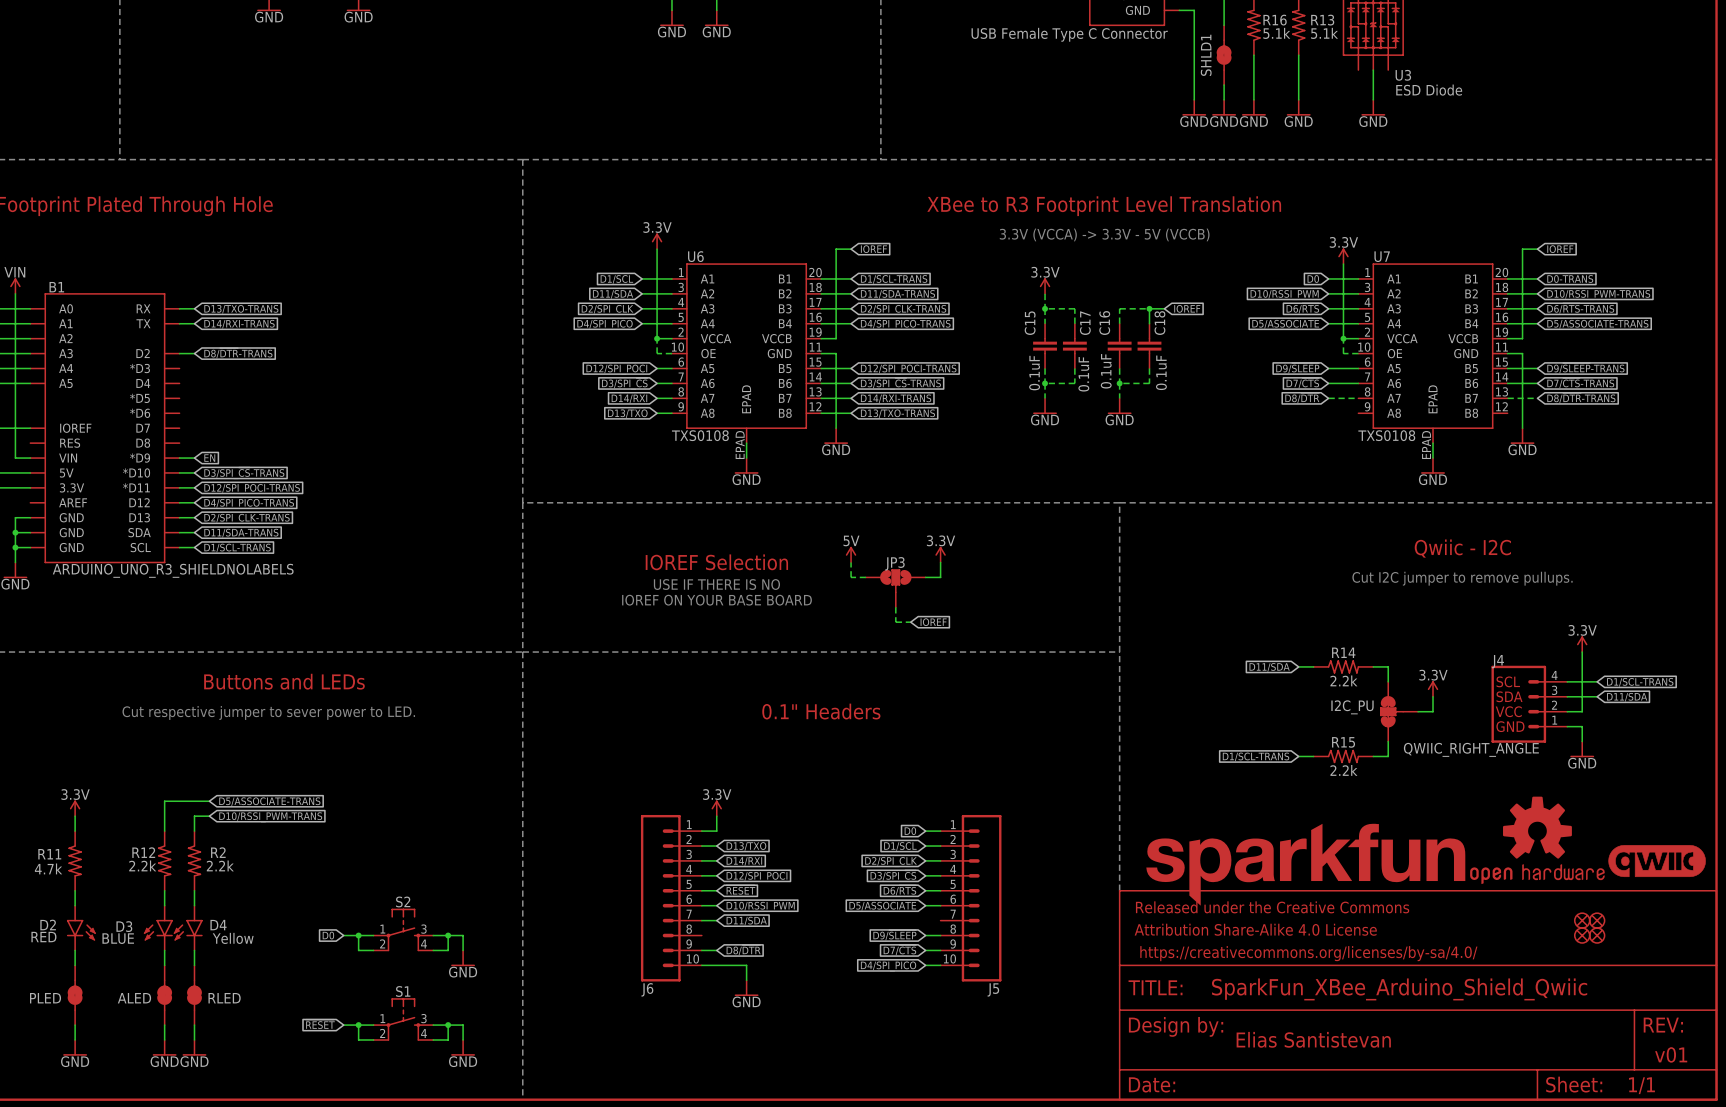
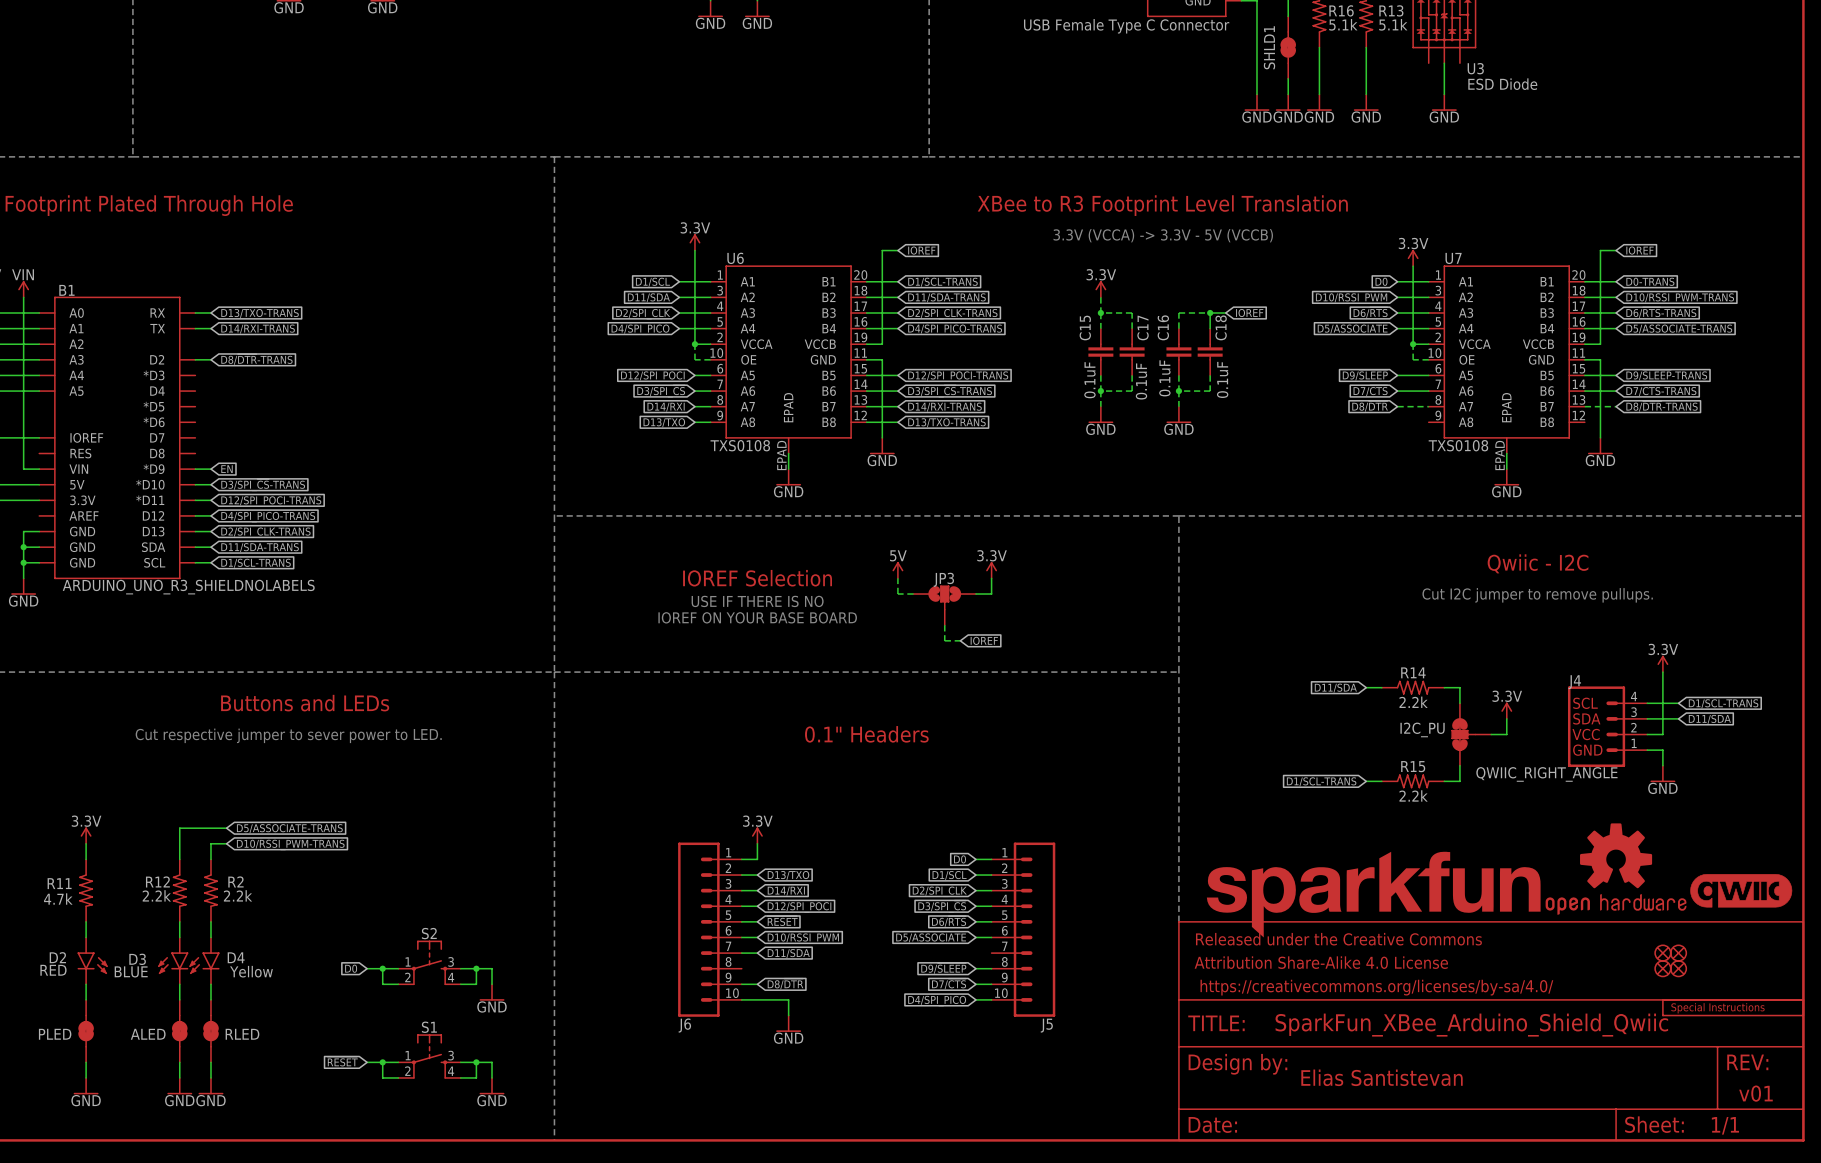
part: none -> (1733, 1007)

